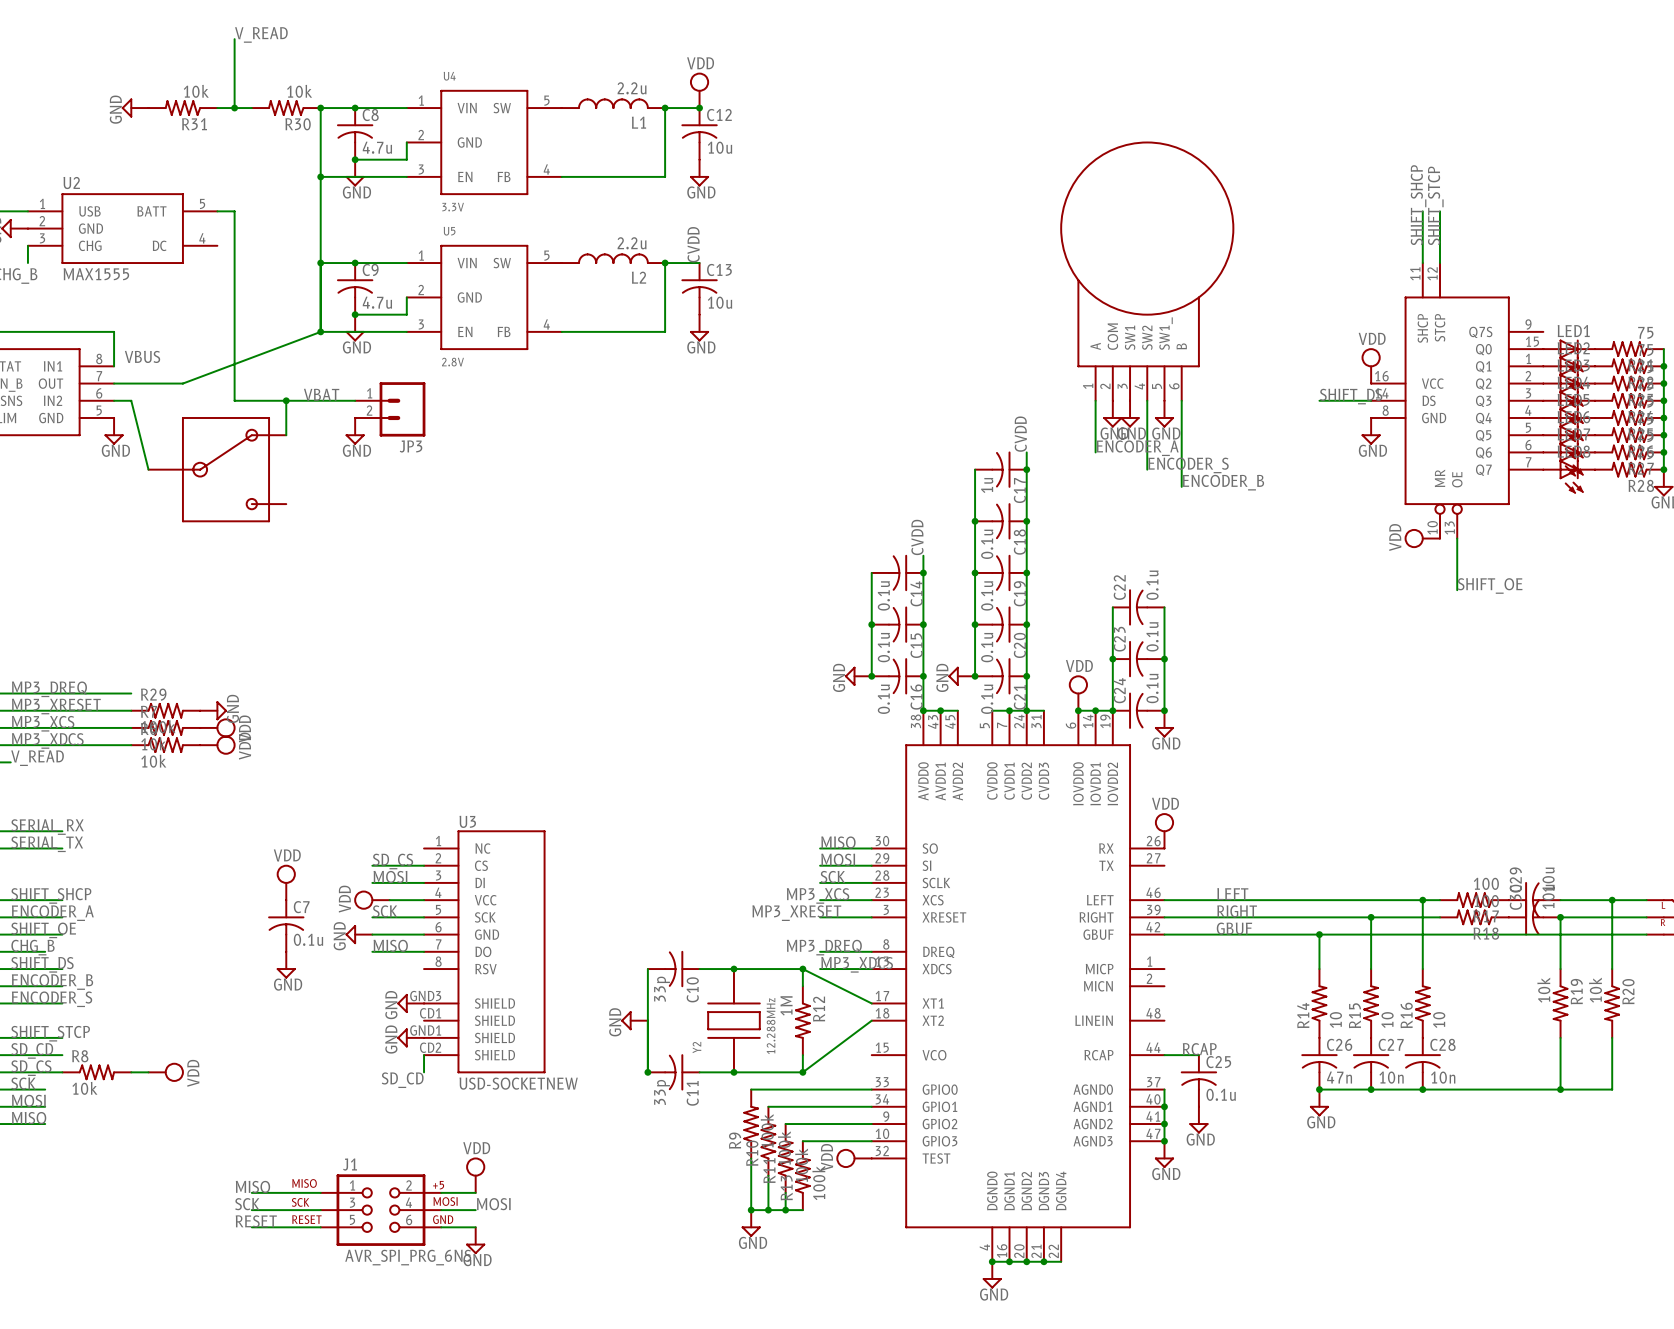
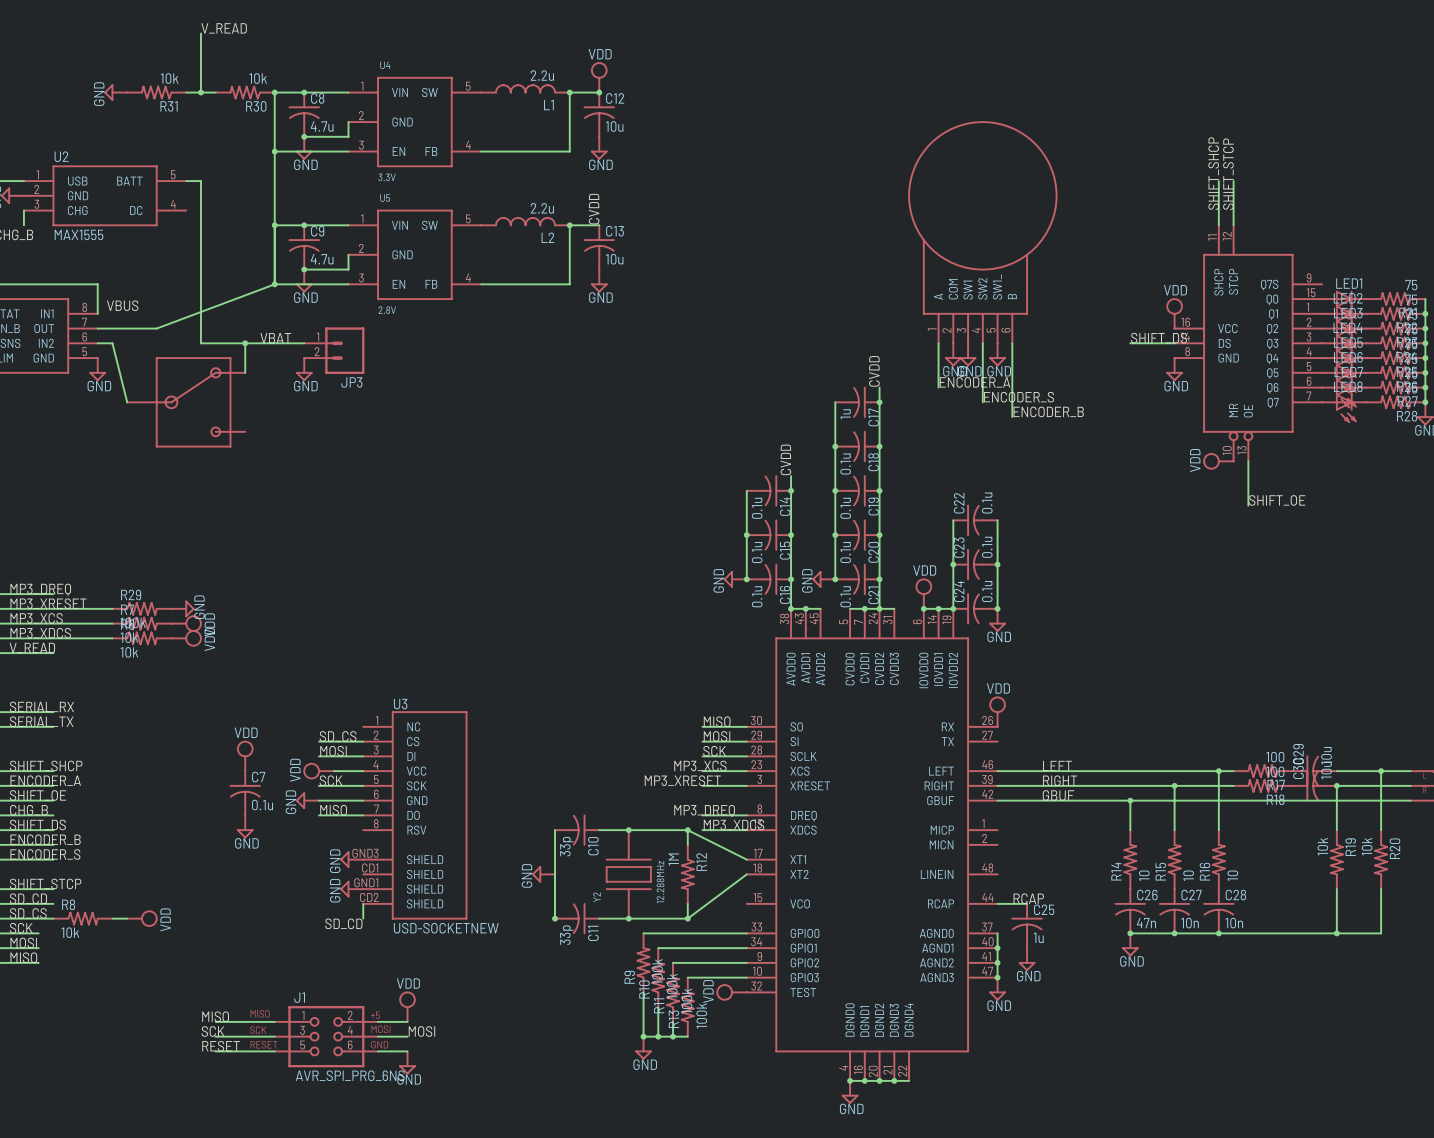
wire: (62, 693) (131, 693) -> none
wire: none -> (9, 653) (53, 653)
wire: none -> (38, 815) (53, 815)
C25 value: 0.1u (1221, 1094) -> 1u (1038, 937)

